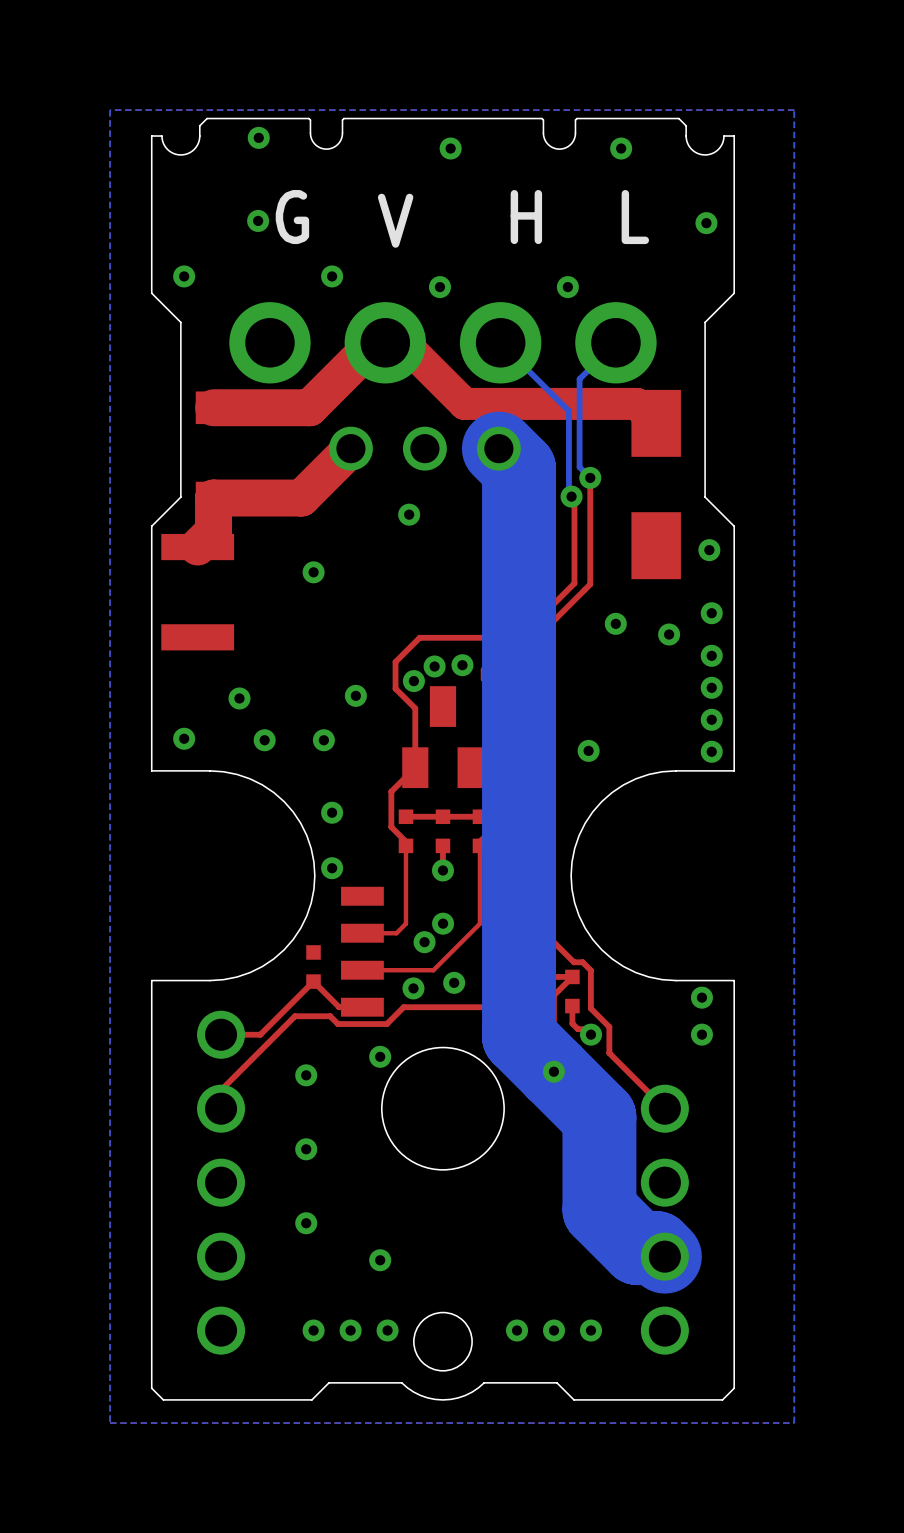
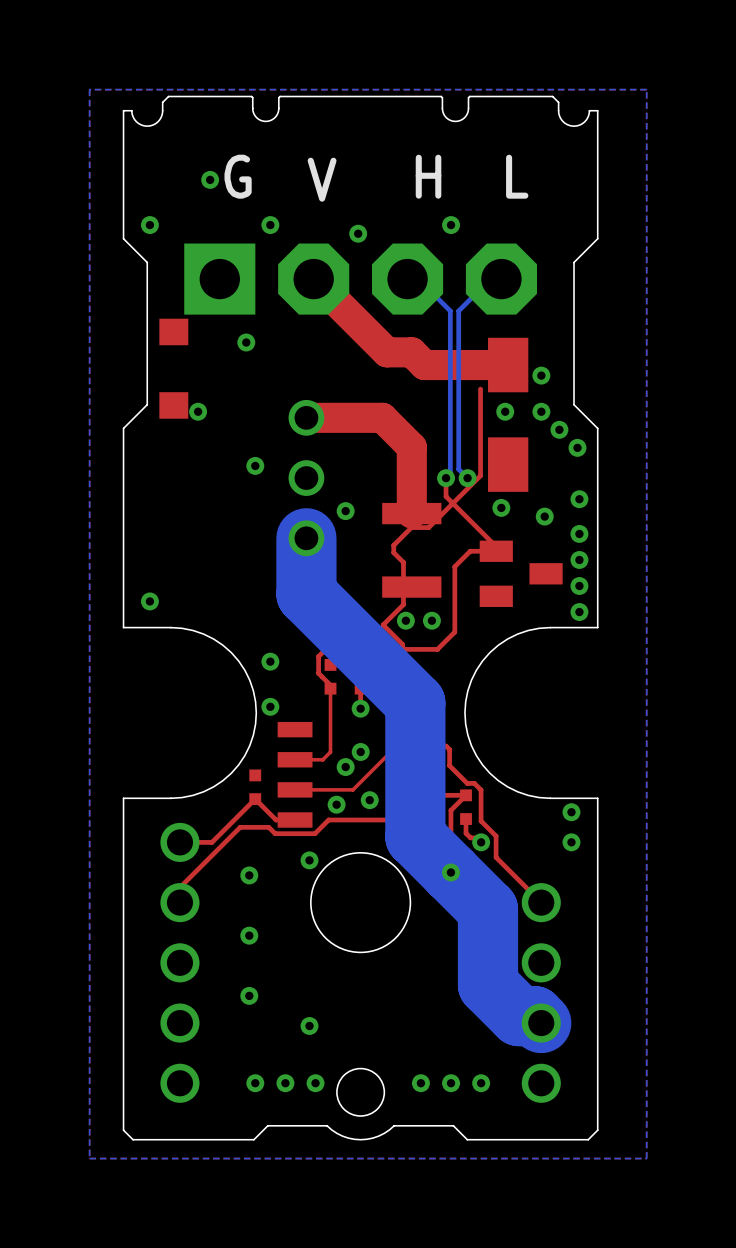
via: (258, 137) -> none
via: (450, 148) -> none
via: (621, 148) -> none
via: (706, 223) -> none
via position: (567, 287) -> (451, 225)
part footprint: [229, 302, 657, 384] -> [184, 243, 538, 315]
top track: none -> (313, 279) (386, 352) (411, 352) (424, 365) (508, 365)
bottom track: (500, 342) (568, 411) (568, 494) (571, 496) -> (407, 279) (418, 279) (450, 310) (450, 473) (446, 478)
bottom track: (615, 342) (579, 379) (579, 467) (590, 477) -> (501, 279) (490, 279) (458, 310) (458, 469) (467, 478)
top track: (213, 407) (309, 407) (374, 342) (403, 342) (464, 403) (636, 403) (656, 423) -> none
via: none -> (246, 342)
top track: (350, 448) (301, 498) (213, 498) (213, 531) (197, 547) -> none
part rotation: 0° (424, 448) -> 90° clockwise (306, 478)
part position: (424, 448) -> (306, 478)
bottom track: (498, 448) (519, 468) (519, 1036) -> (306, 538) (306, 594) (415, 703) (415, 836) (422, 844)
via: none -> (541, 375)
via: (590, 477) -> none
part position: (656, 484) -> (508, 414)
top track: (571, 496) (574, 499) (574, 583) (520, 637) (419, 637) (395, 661) (395, 688) (415, 708) (415, 767) (391, 791) (391, 806) -> (446, 478) (446, 496) (496, 546) (496, 551) (470, 551) (454, 566) (454, 632) (437, 649) (325, 649) (318, 656)
via: (571, 496) -> none
via: none -> (198, 411)
via: none -> (505, 411)
via: none -> (541, 411)
top track: none -> (306, 417) (382, 417) (411, 447) (411, 513)
via: (409, 514) -> none
via: none -> (559, 429)
via: none -> (446, 478)
via: none -> (467, 478)
part position: (197, 592) -> (411, 550)
via: none -> (345, 511)
via: (462, 665) -> none
via: (434, 666) -> none
via: (413, 681) -> none
via: (355, 695) -> none
via: (239, 698) -> none
part rotation: 0° (442, 737) -> 90° clockwise (521, 573)
part position: (442, 737) -> (521, 573)
via: (264, 740) -> none
via: (323, 740) -> none
via: (588, 750) -> none
via: none -> (405, 620)
via: none -> (431, 620)

